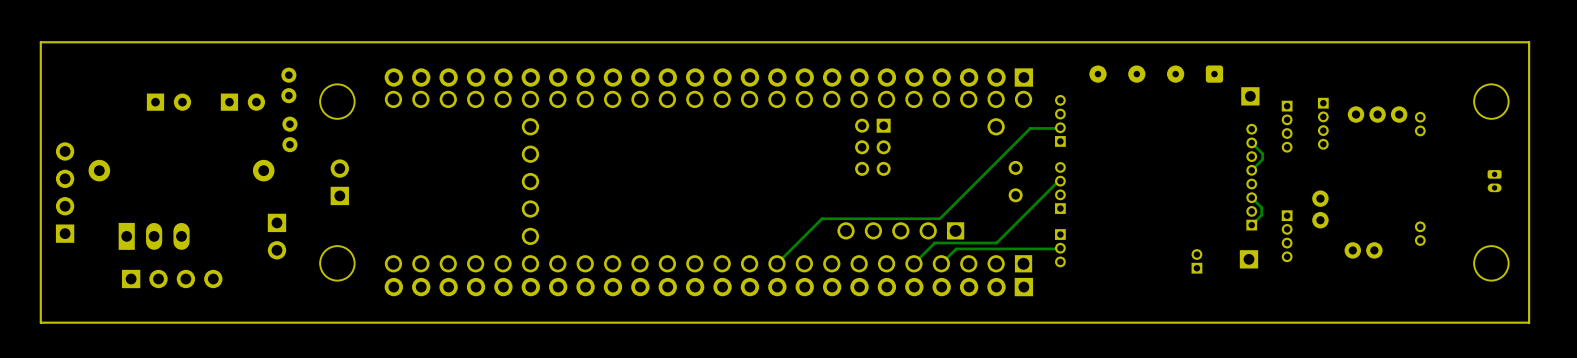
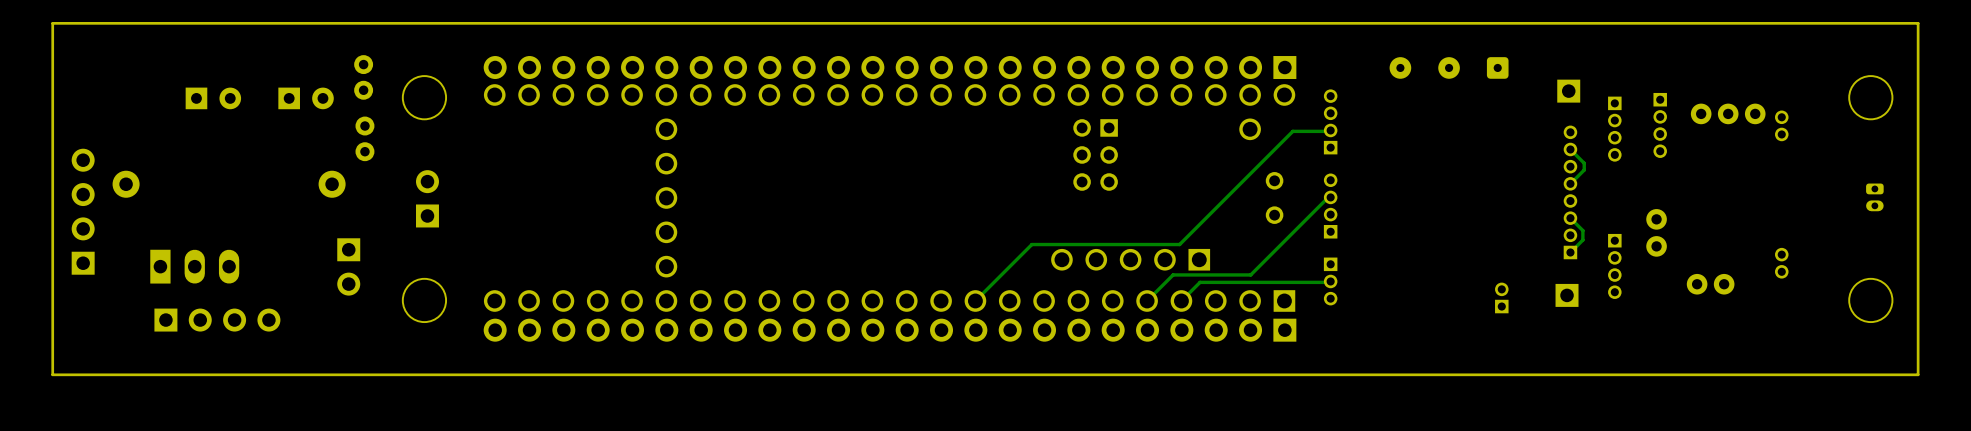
part footprint: [1089, 65, 1224, 83] -> [1389, 57, 1509, 79]

